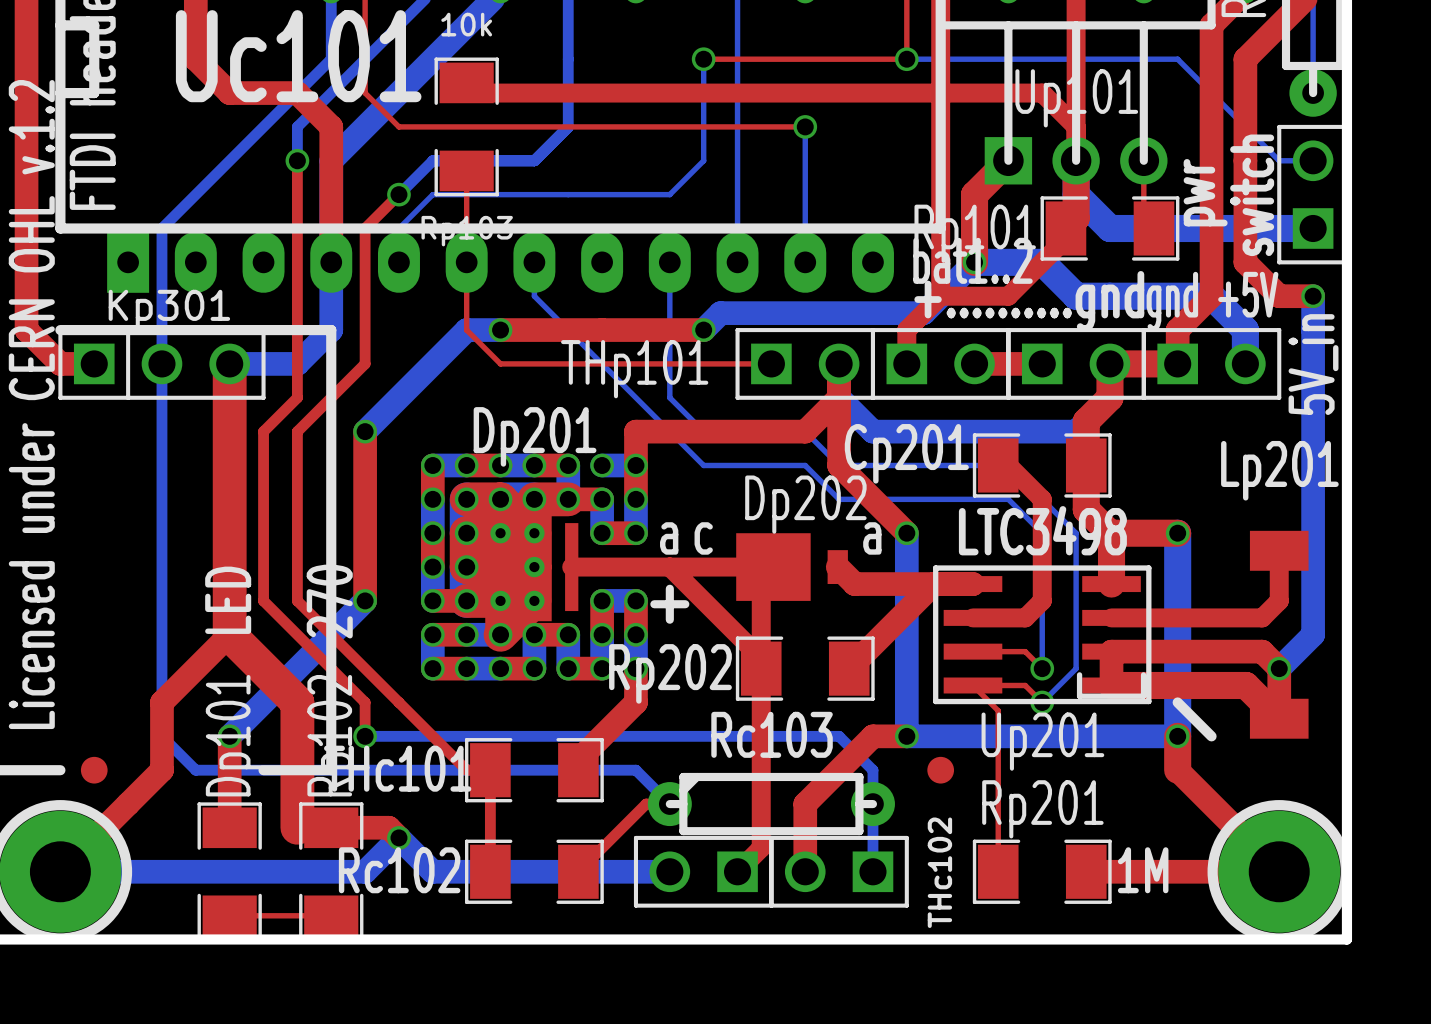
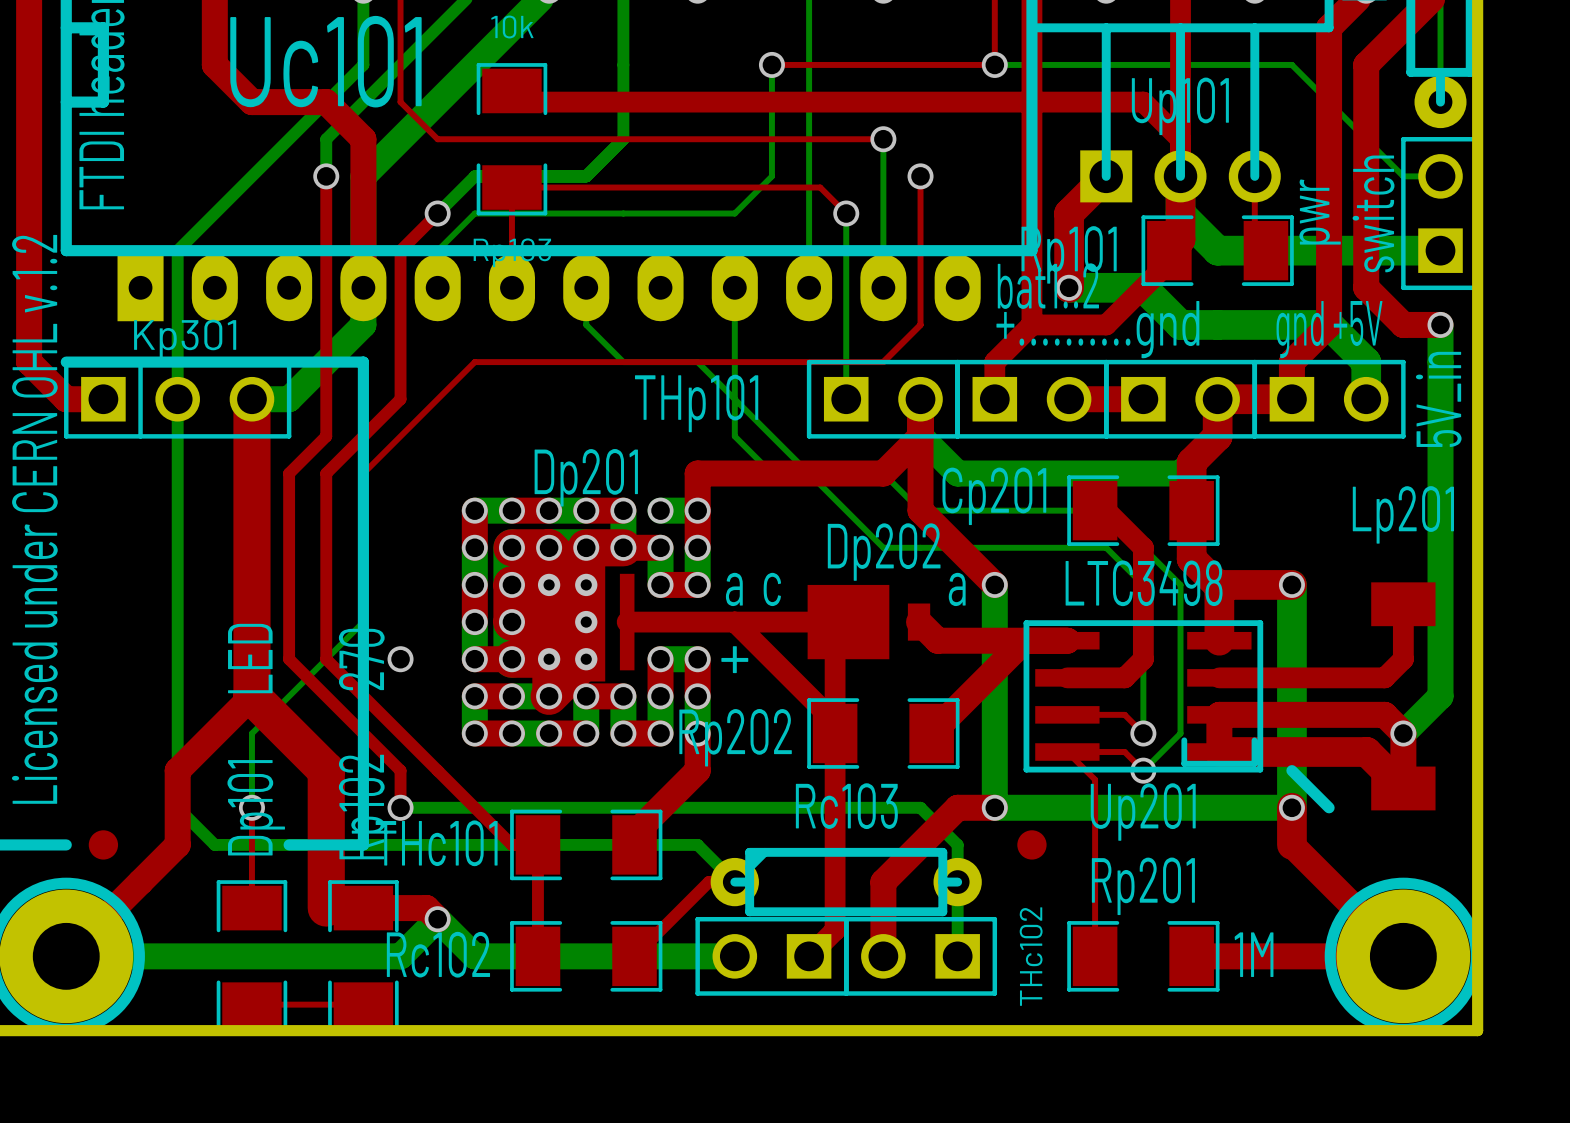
top track: none -> (920, 176) (920, 324) (883, 362) (771, 362)
via: none -> (920, 176)
top track: none -> (511, 187) (820, 187) (846, 213)
bottom track: none -> (846, 213) (846, 399)
via: none -> (846, 213)
top track: (466, 262) (466, 330) (500, 363) (771, 363) -> none
bottom track: (974, 262) (923, 313) (720, 313) (703, 330) -> none
bottom track: (331, 296) (331, 330) (297, 363) (263, 363) -> (363, 324) (289, 399)
top track: none -> (549, 362) (474, 362) (363, 473) (363, 622)
top track width: thick (500, 330) (703, 330) -> thin (549, 362) (771, 362)
bottom track: (500, 330) (466, 330) (365, 431) -> none
via: (500, 330) -> none
bottom track: (568, 330) (703, 465) (805, 465) (839, 499) -> (623, 362) (697, 362) (883, 547) (920, 547)
via: (703, 330) -> none
top track: (365, 431) (365, 600) -> none
via: (365, 431) -> none
bottom track: (365, 600) (229, 736) -> (363, 622) (251, 733) (251, 807)
top track width: thick (229, 736) (229, 827) -> thin (251, 807) (251, 908)

